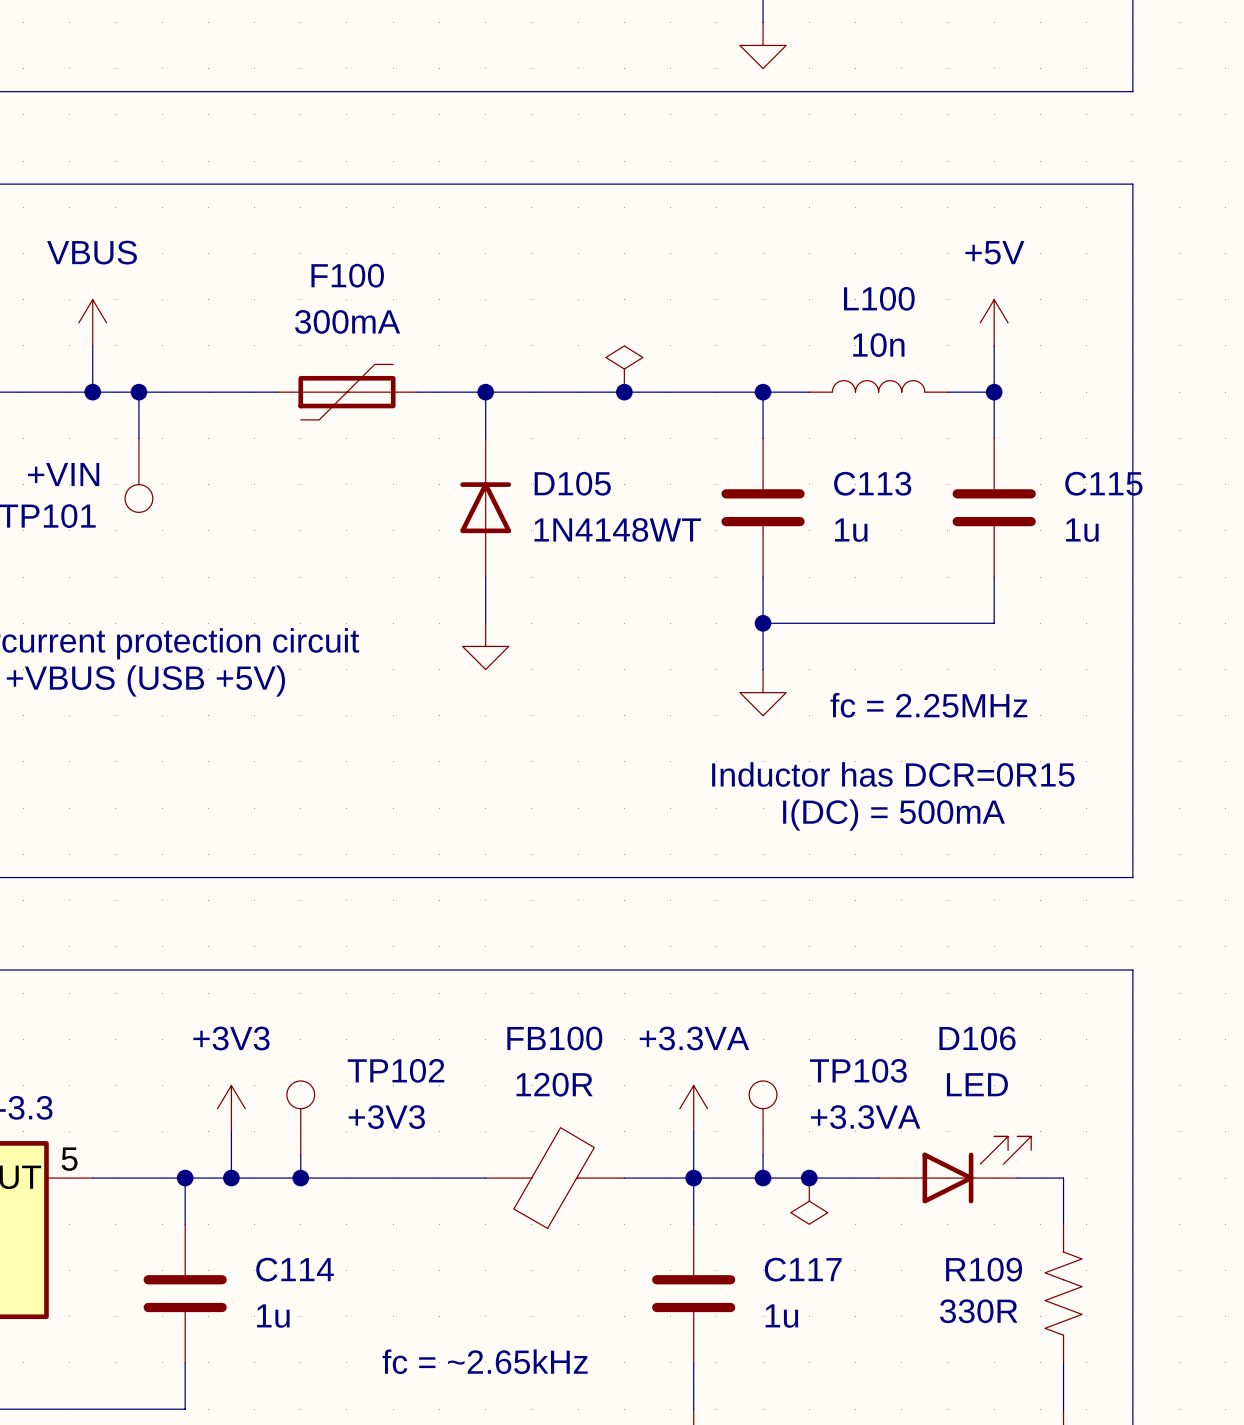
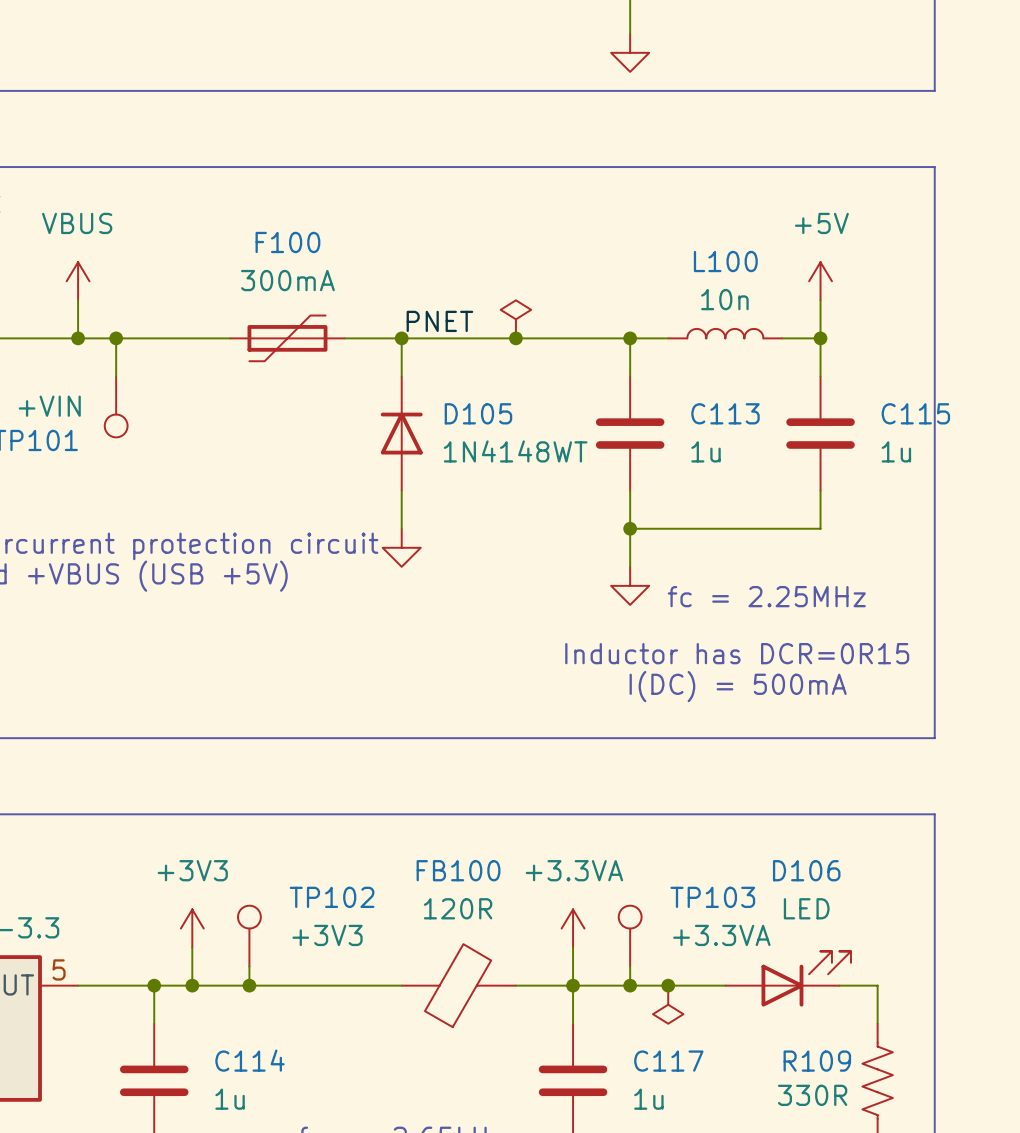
label: none -> PNET (439, 321)

